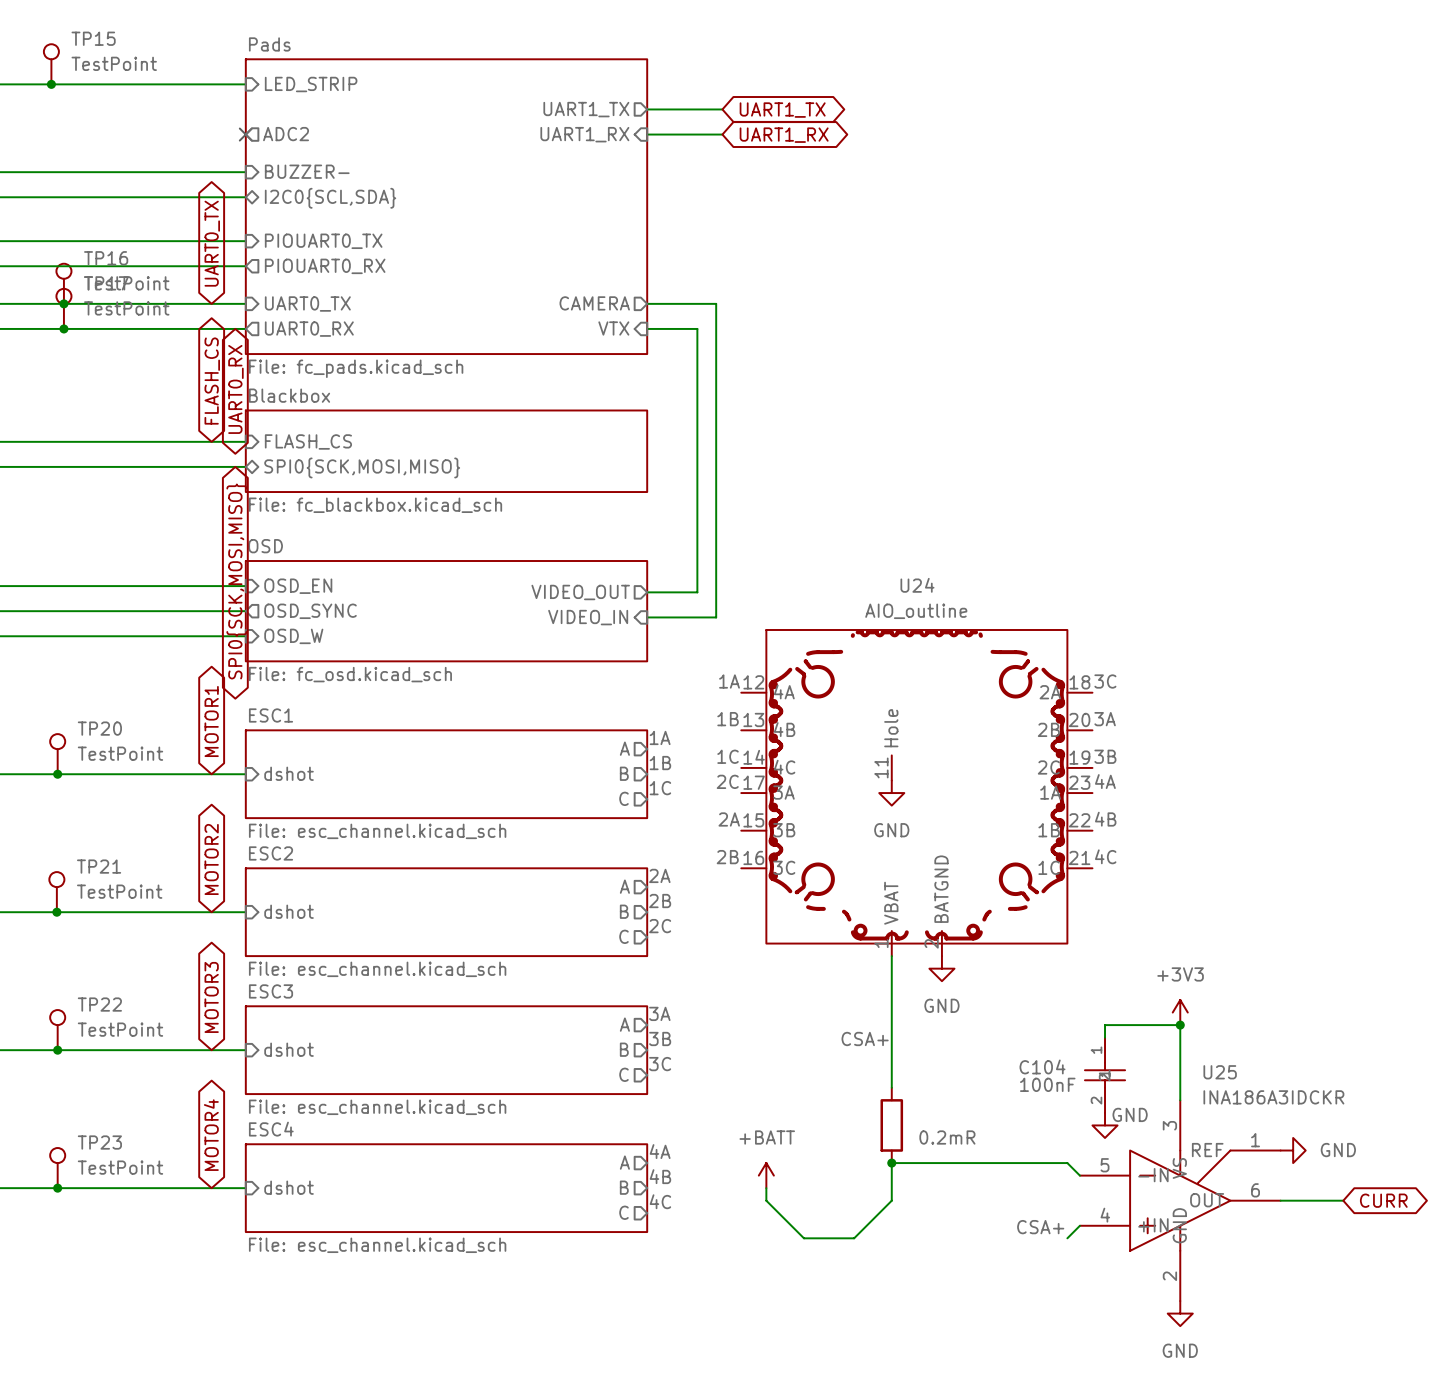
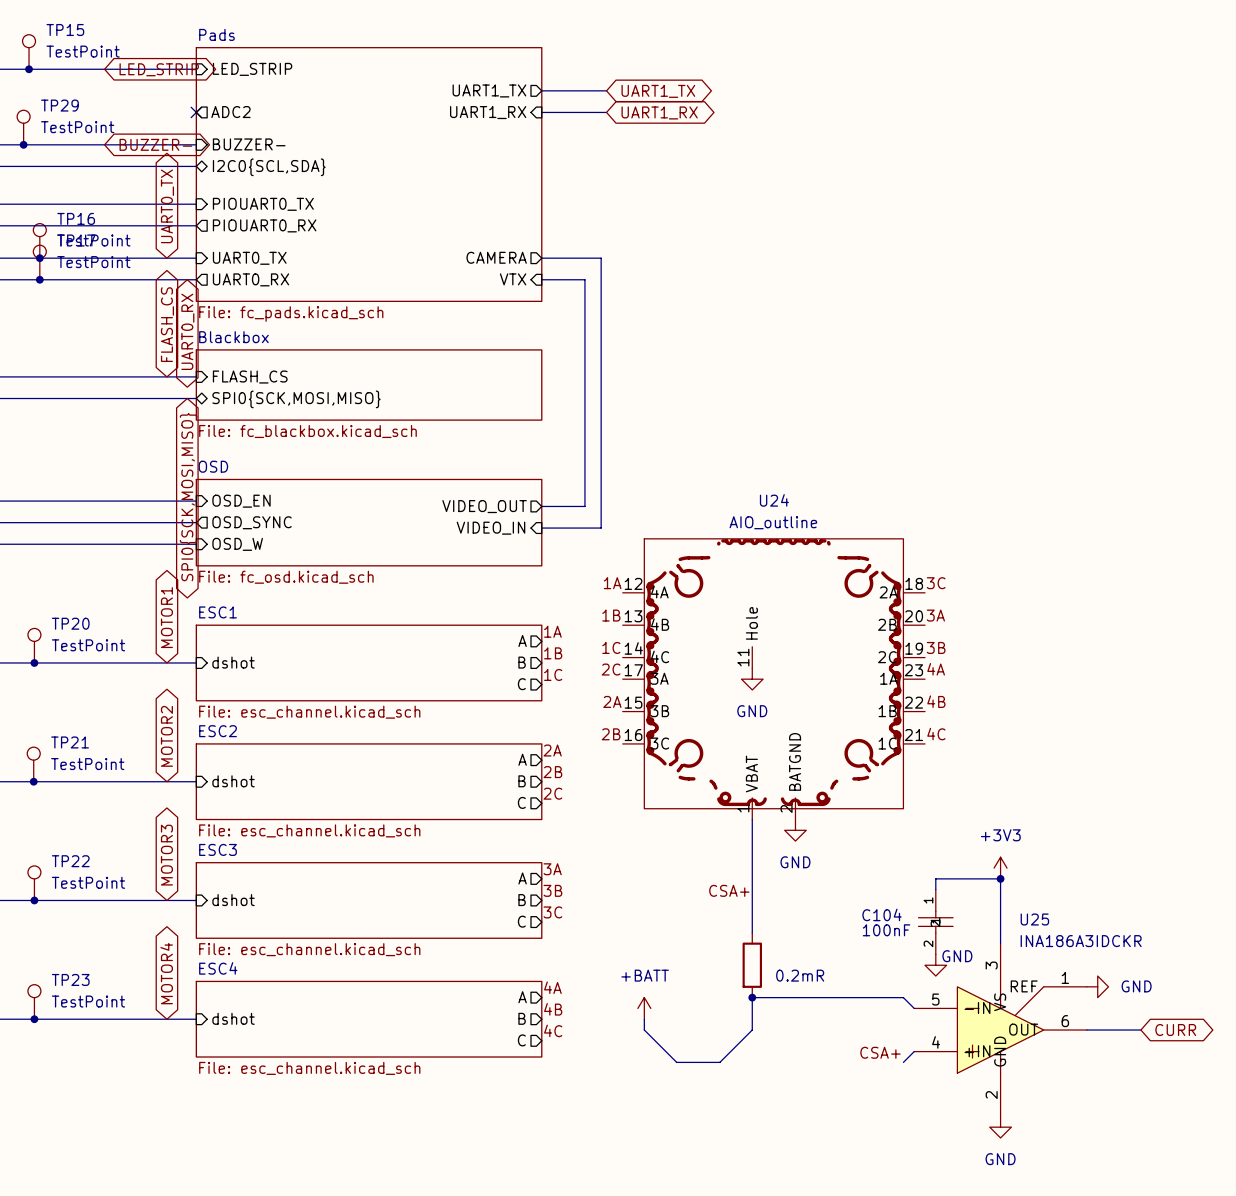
global label: none -> LED_STRIP (159, 69)
TP29: none -> TestPoint (23, 127)
junction: none -> (23, 144)
global label: none -> BUZZER- (155, 144)

